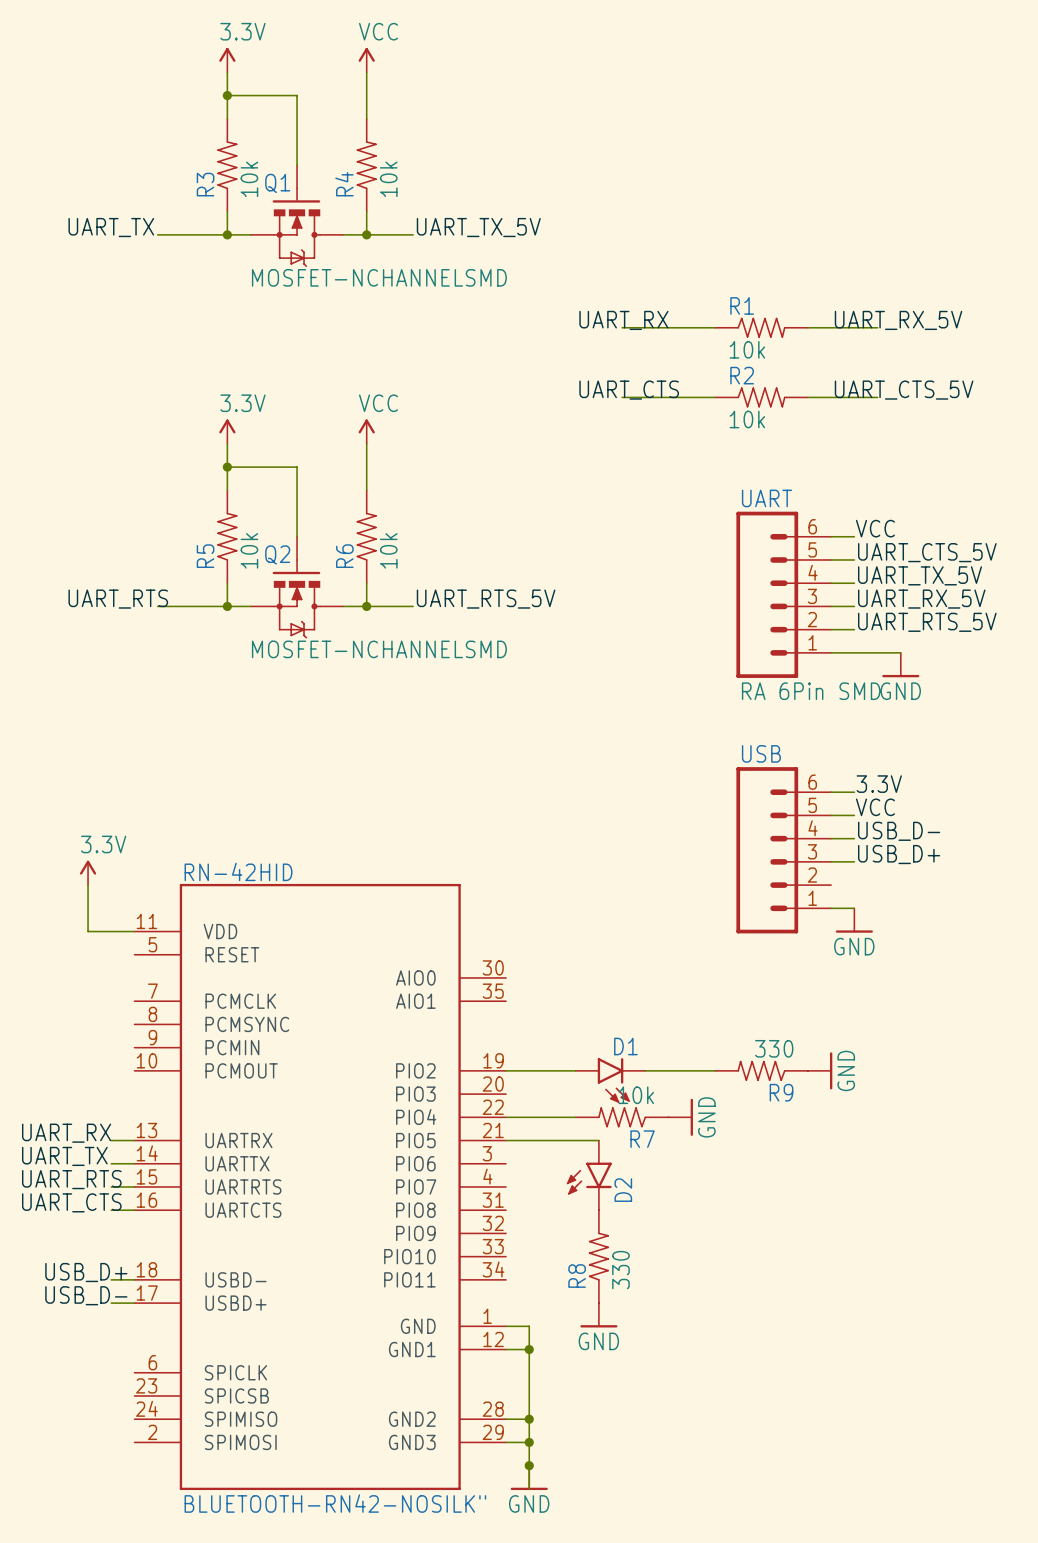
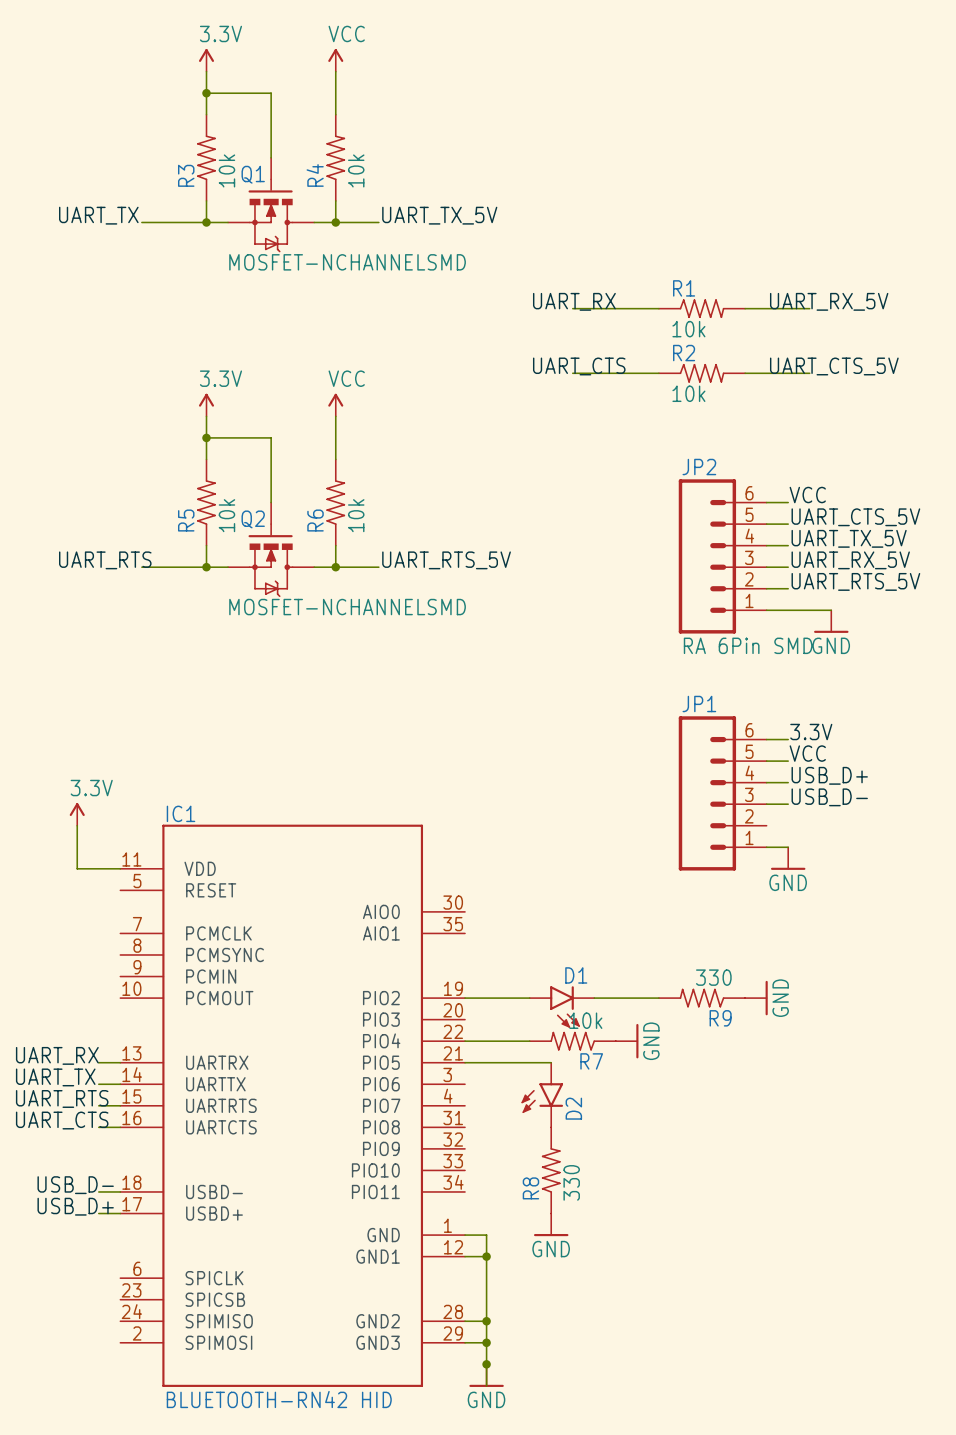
UART name: UART (766, 498) -> JP2 (699, 467)
USB name: USB (761, 753) -> JP1 (699, 704)
label: USB_D- (899, 831) -> USB_D+ (829, 775)
label: USB_D+ (899, 854) -> USB_D- (829, 797)
RN-42HID name: RN-42HID (238, 871) -> IC1 (181, 813)
label: USB_D+ (86, 1272) -> USB_D- (75, 1185)
label: USB_D- (86, 1295) -> USB_D+ (75, 1206)
RN-42HID value: BLUETOOTH-RN42-NOSILK" (335, 1503) -> BLUETOOTH-RN42 HID (279, 1399)

